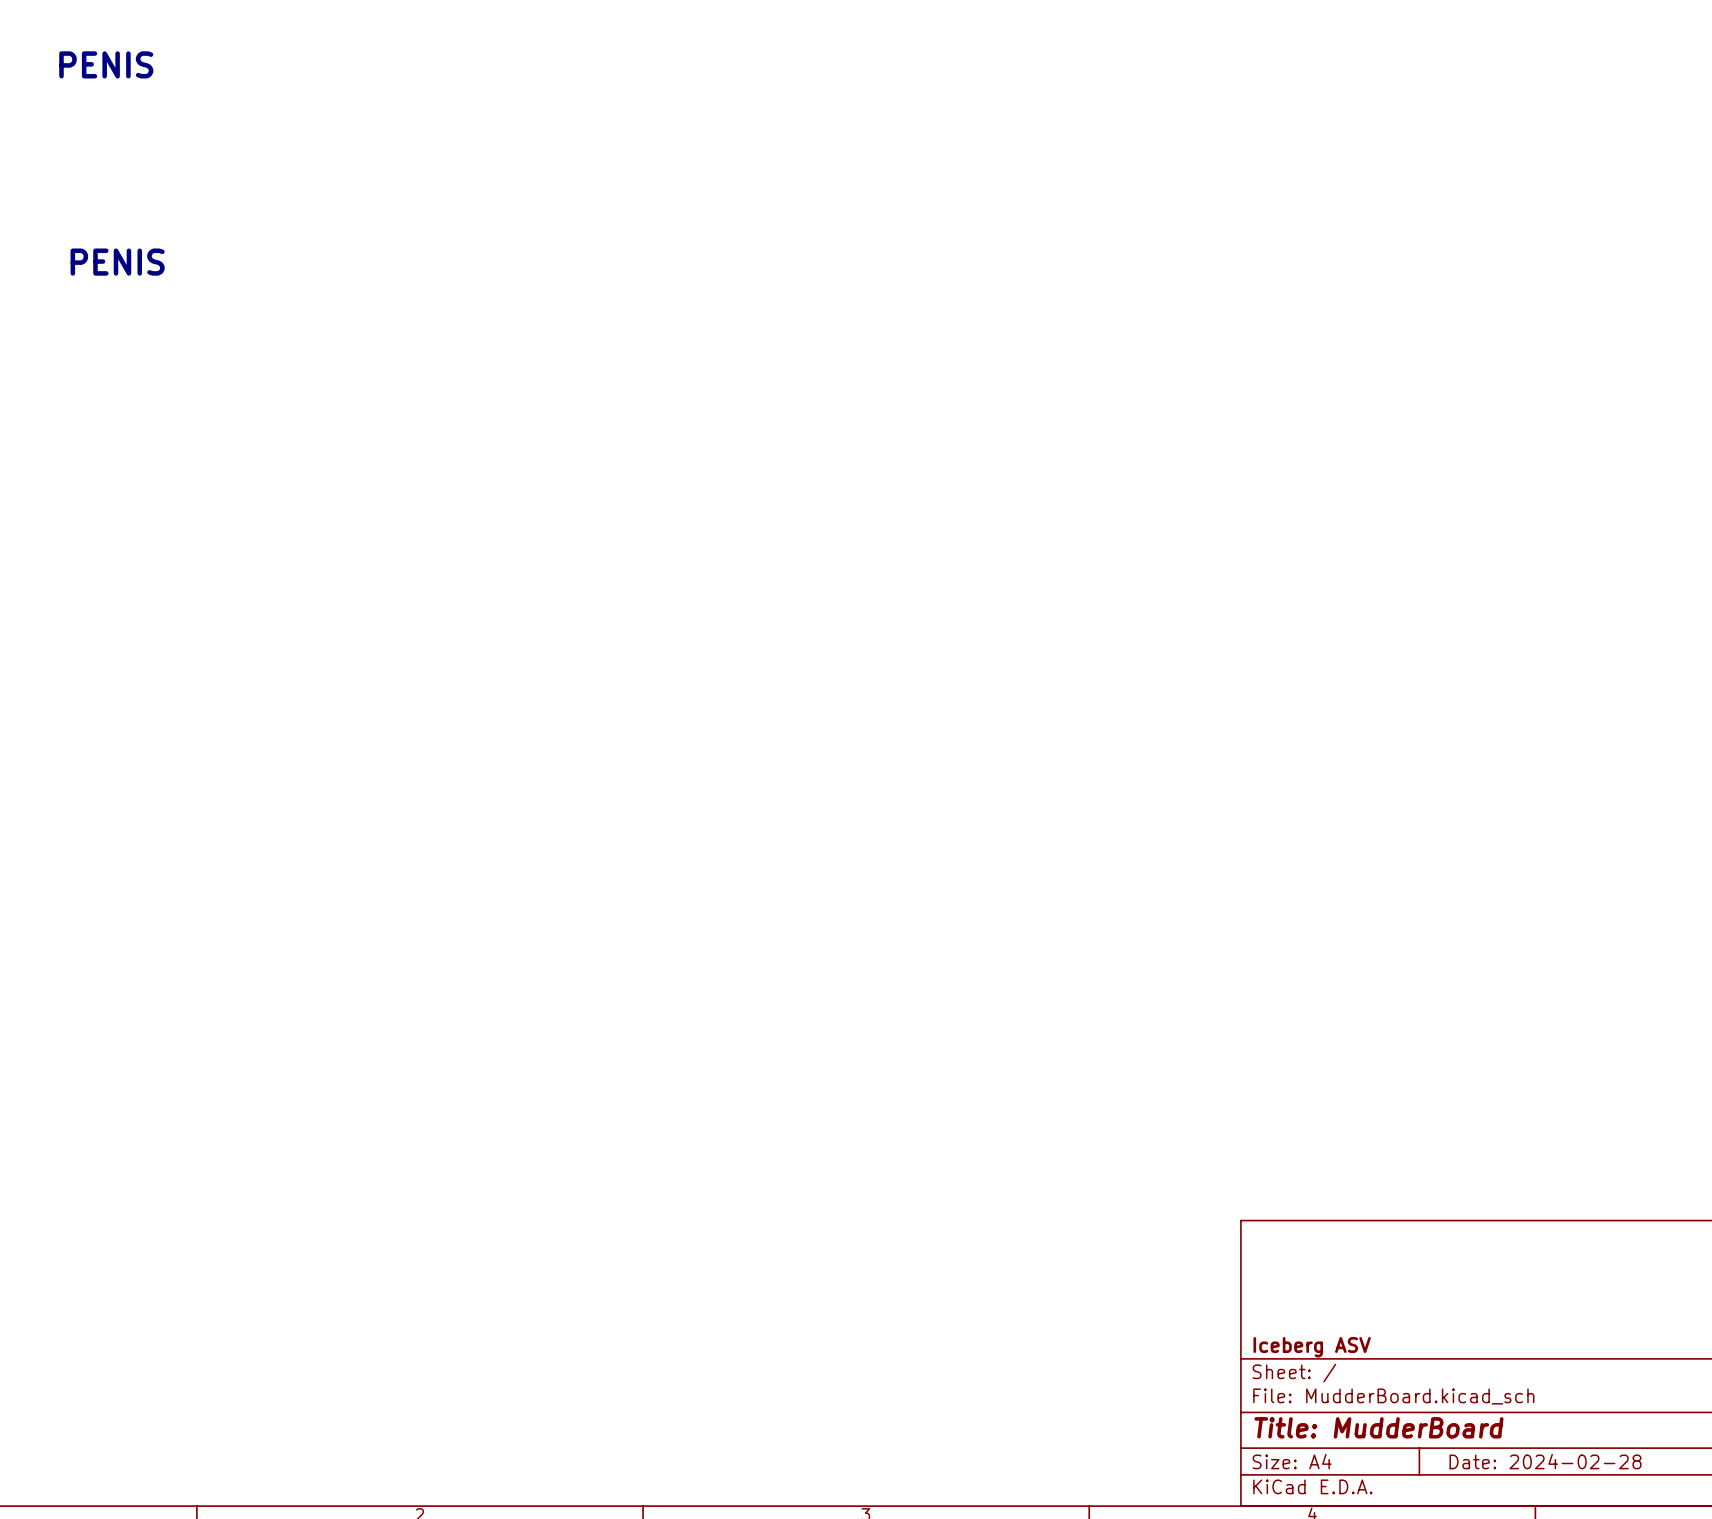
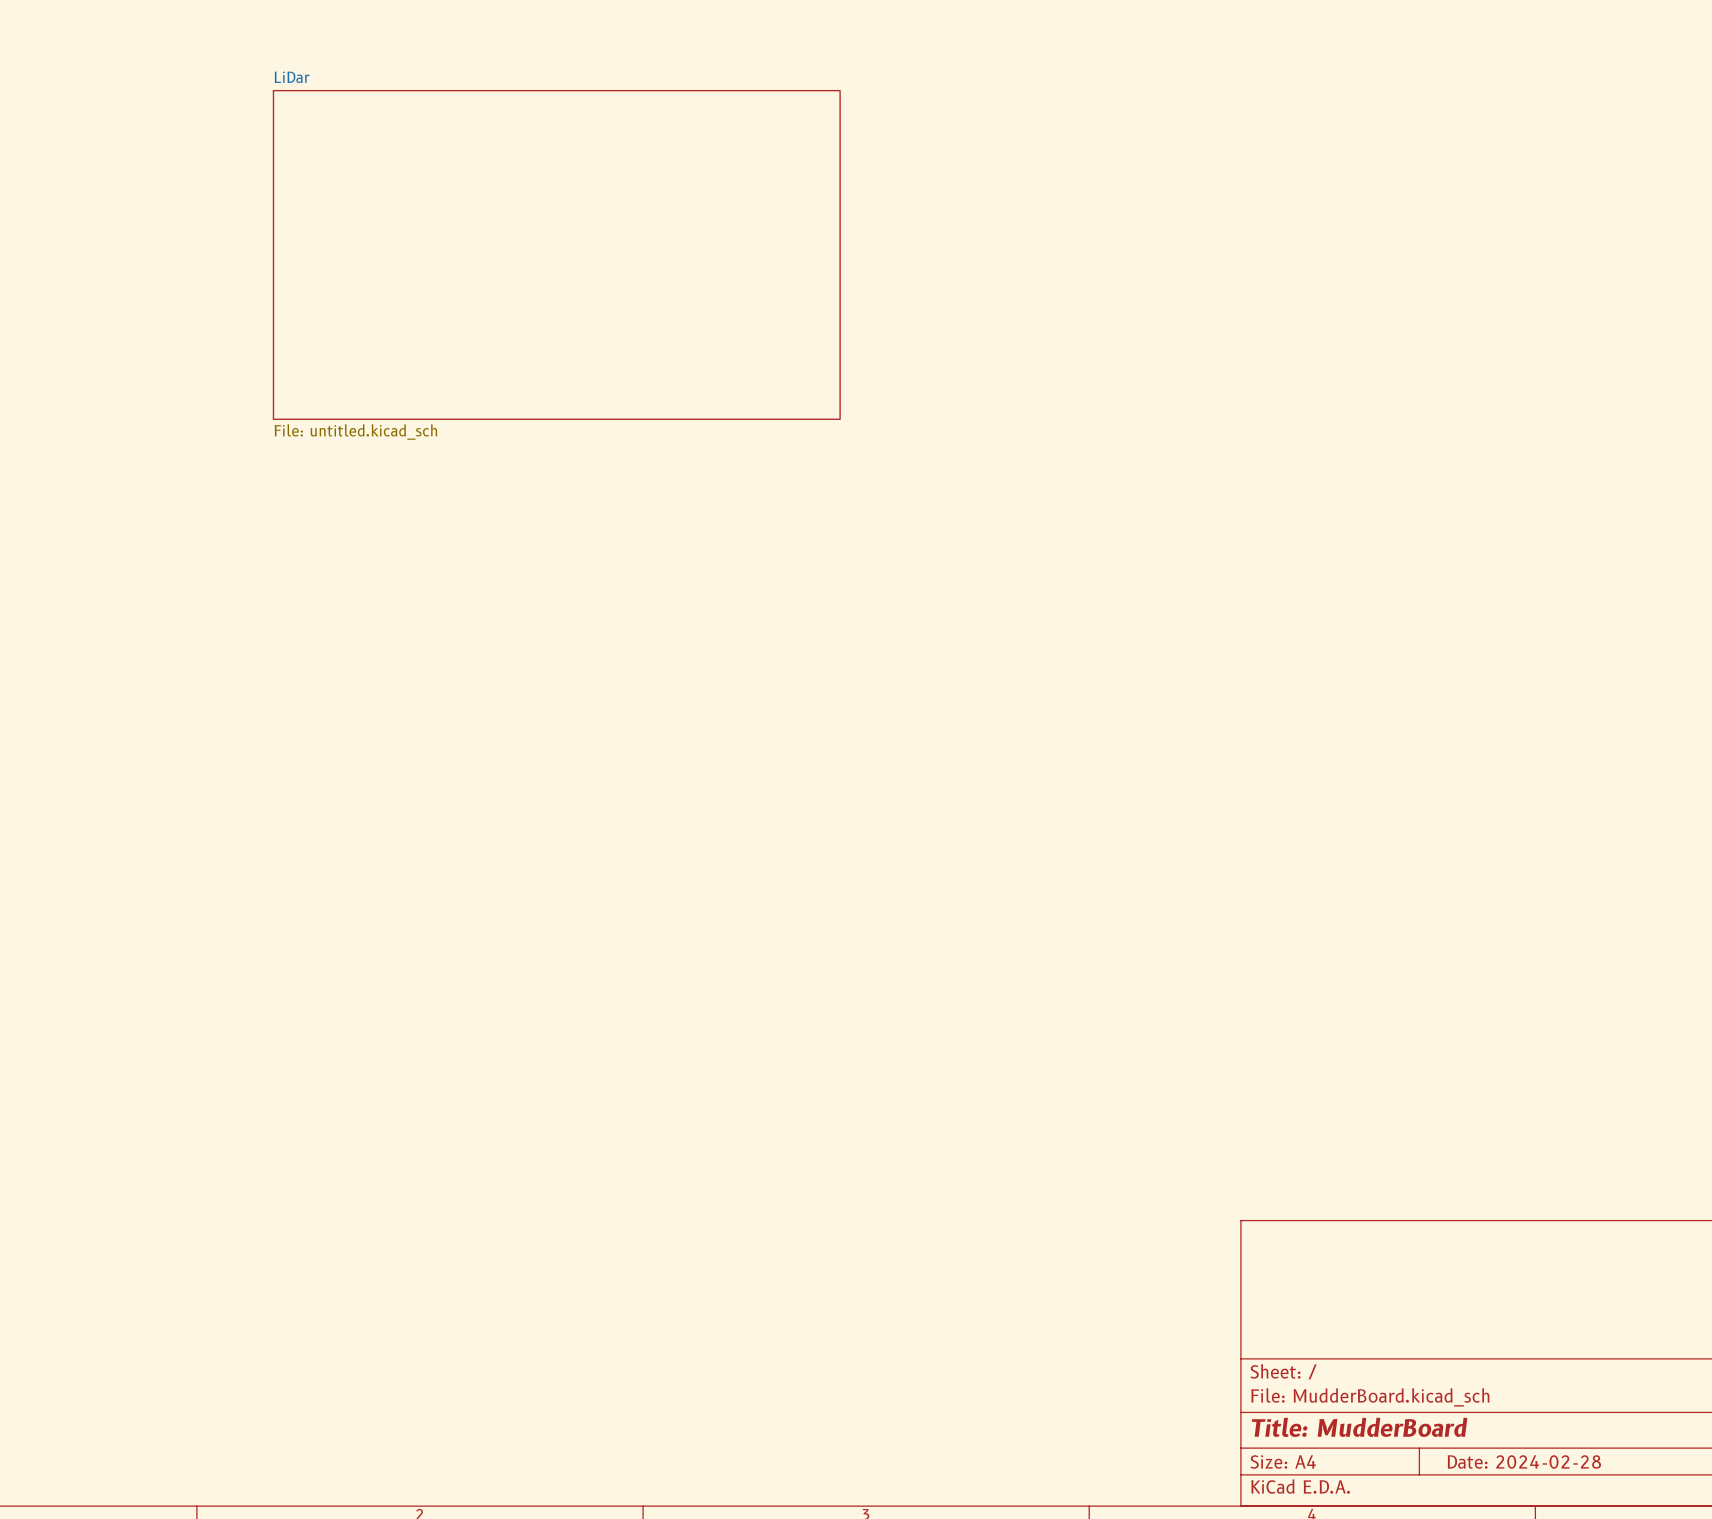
text: PENIS (106, 64) -> none
sheet LiDar: none -> File: untitled.kicad_sch (556, 254)
text: PENIS (117, 262) -> none
title block: Iceberg ASV (1312, 1347) -> none

